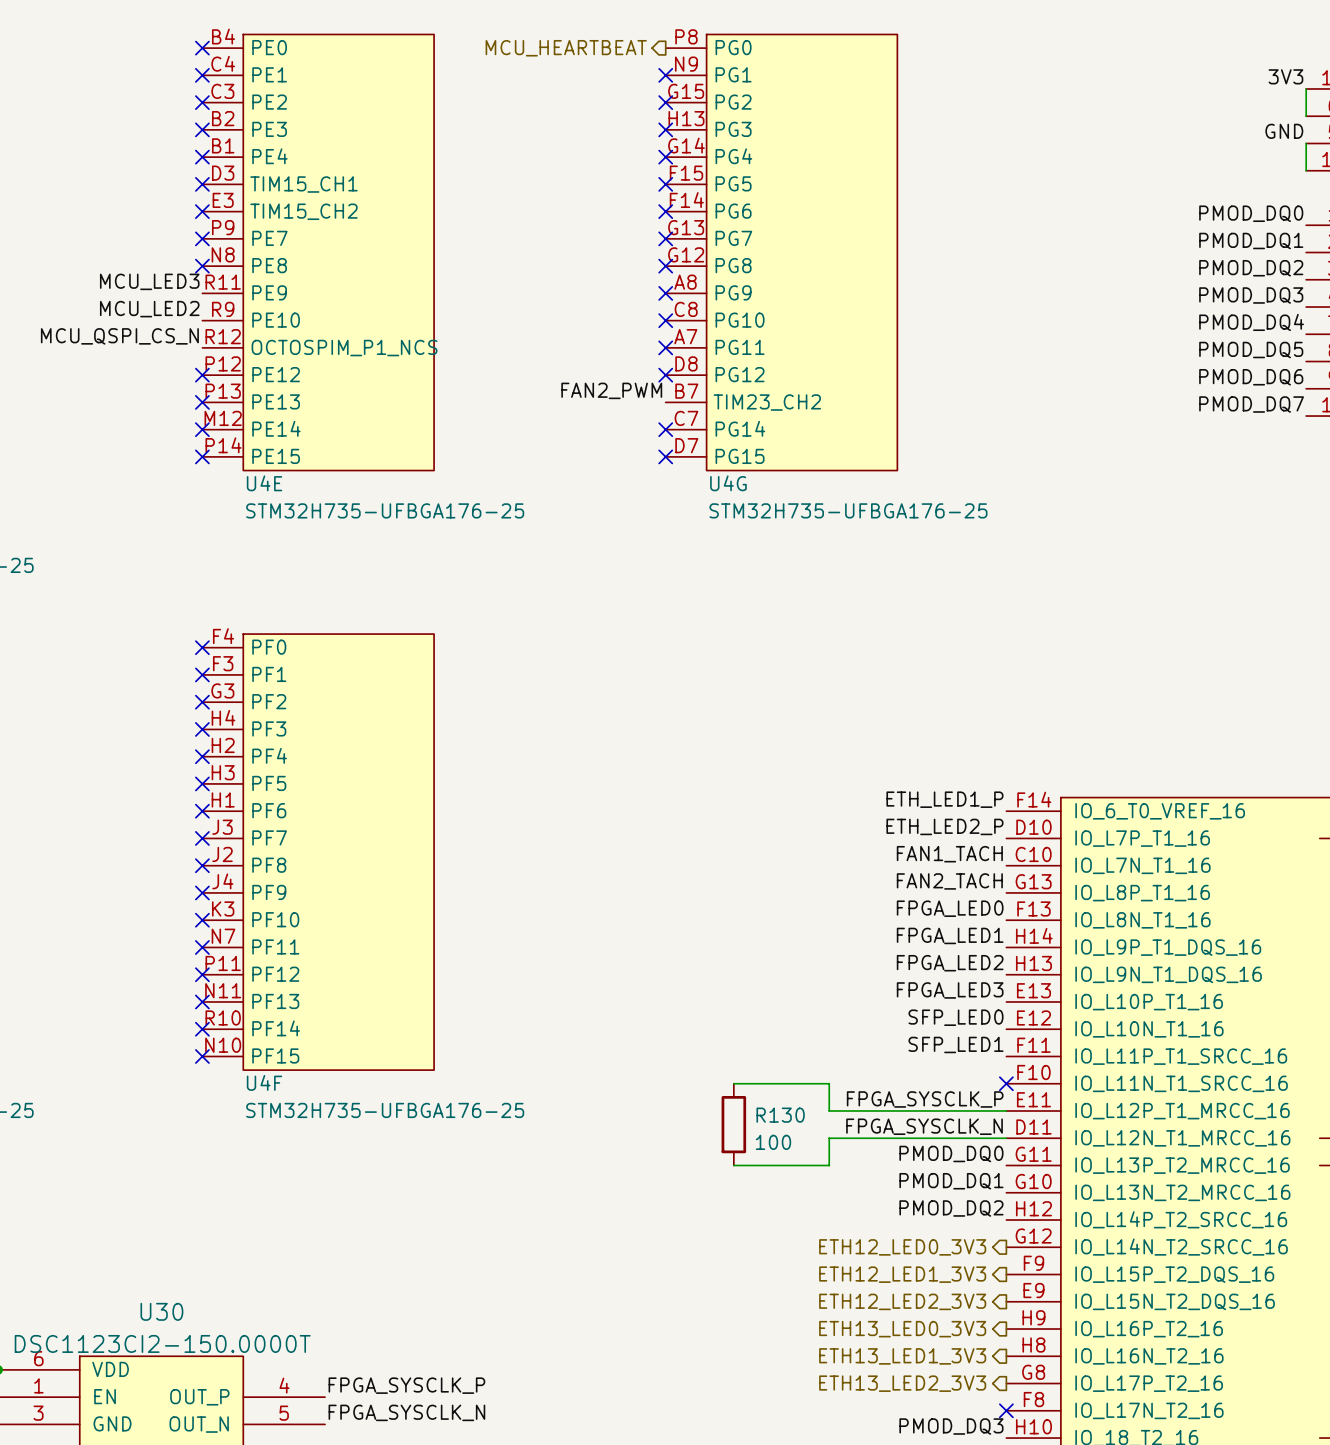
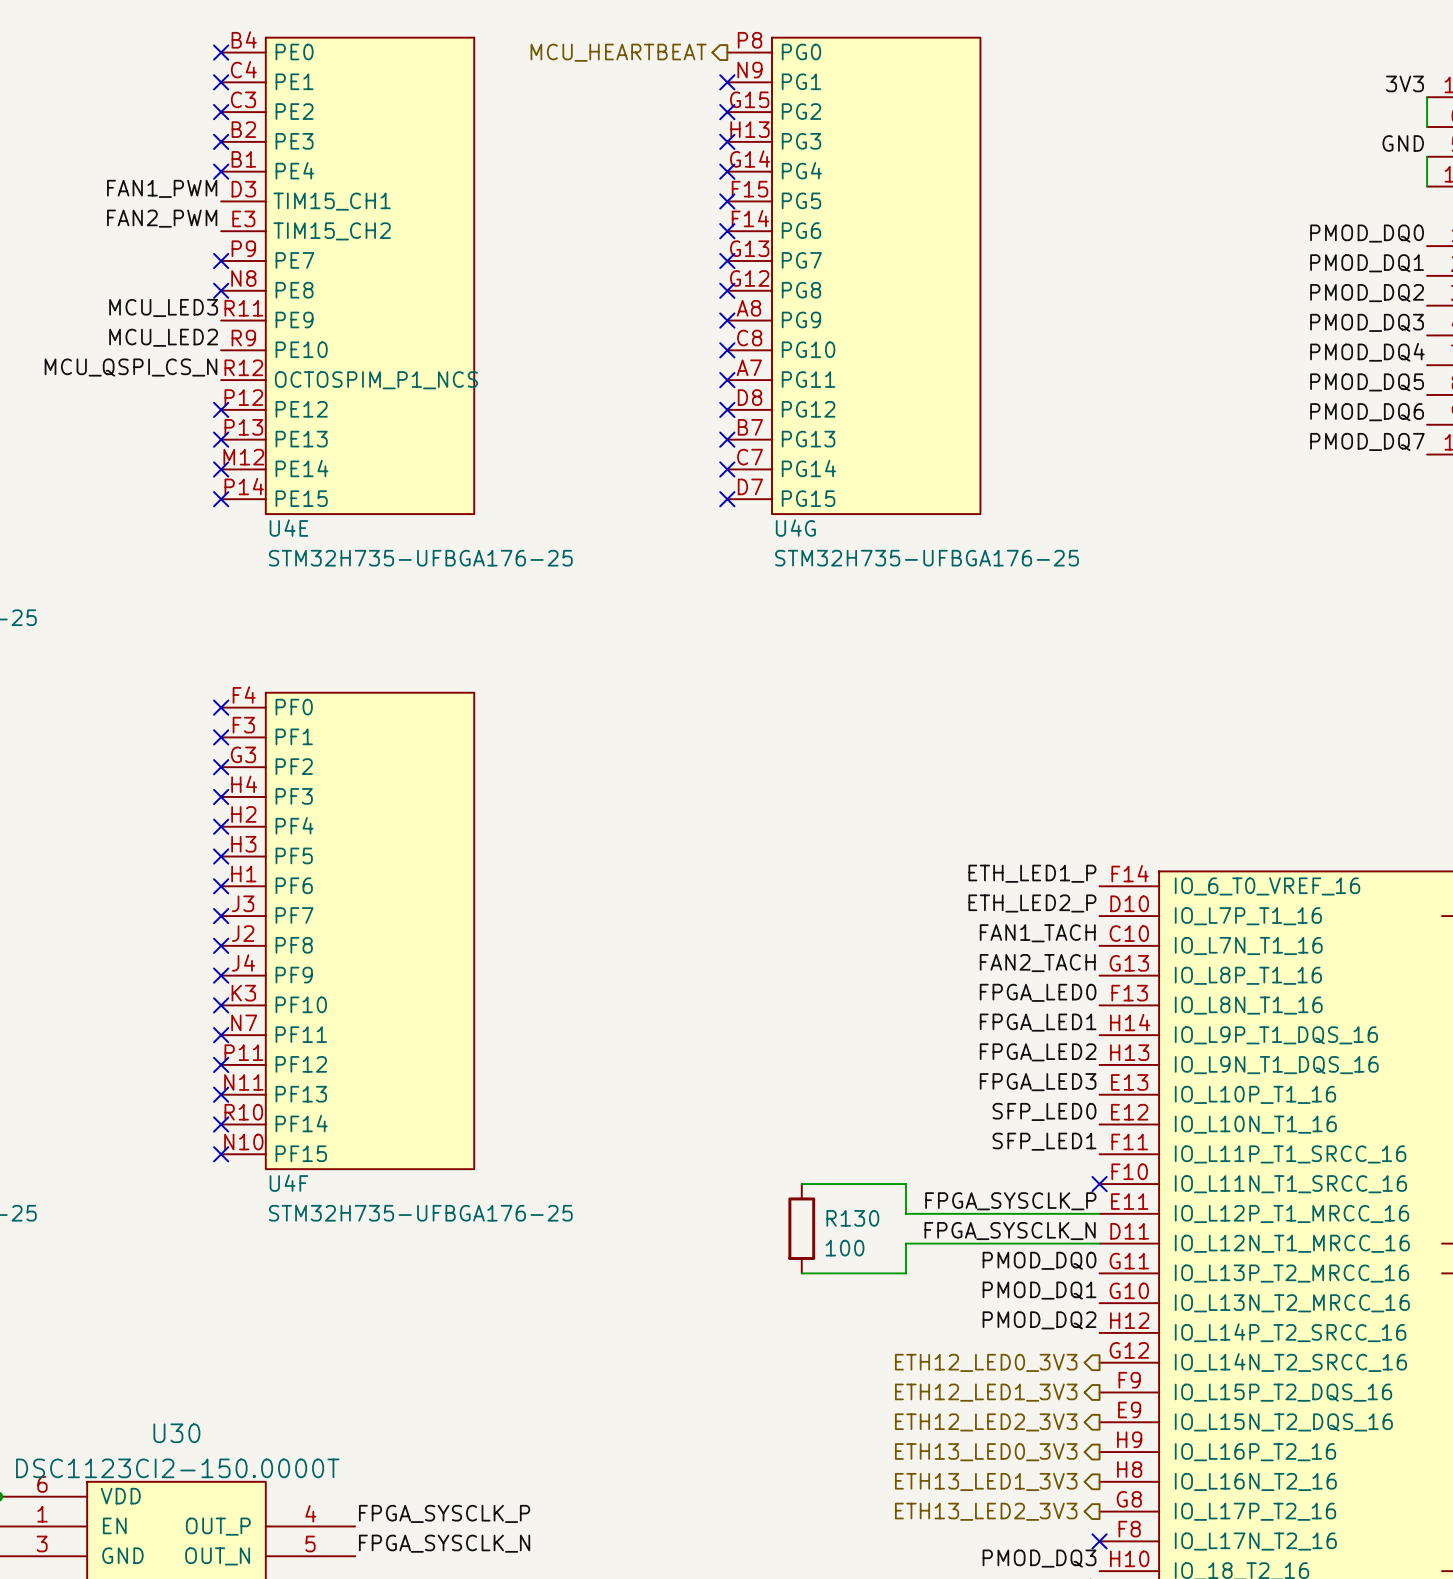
label: none -> FAN1_PWM (162, 188)
no-connect mark: (202, 184) -> none
label: none -> FAN2_PWM (162, 218)
no-connect mark: (202, 211) -> none
label: FAN2_PWM (611, 390) -> none
no-connect mark: none -> (727, 439)
U4G pin name: TIM23_CH2 (767, 402) -> PG13 (808, 439)

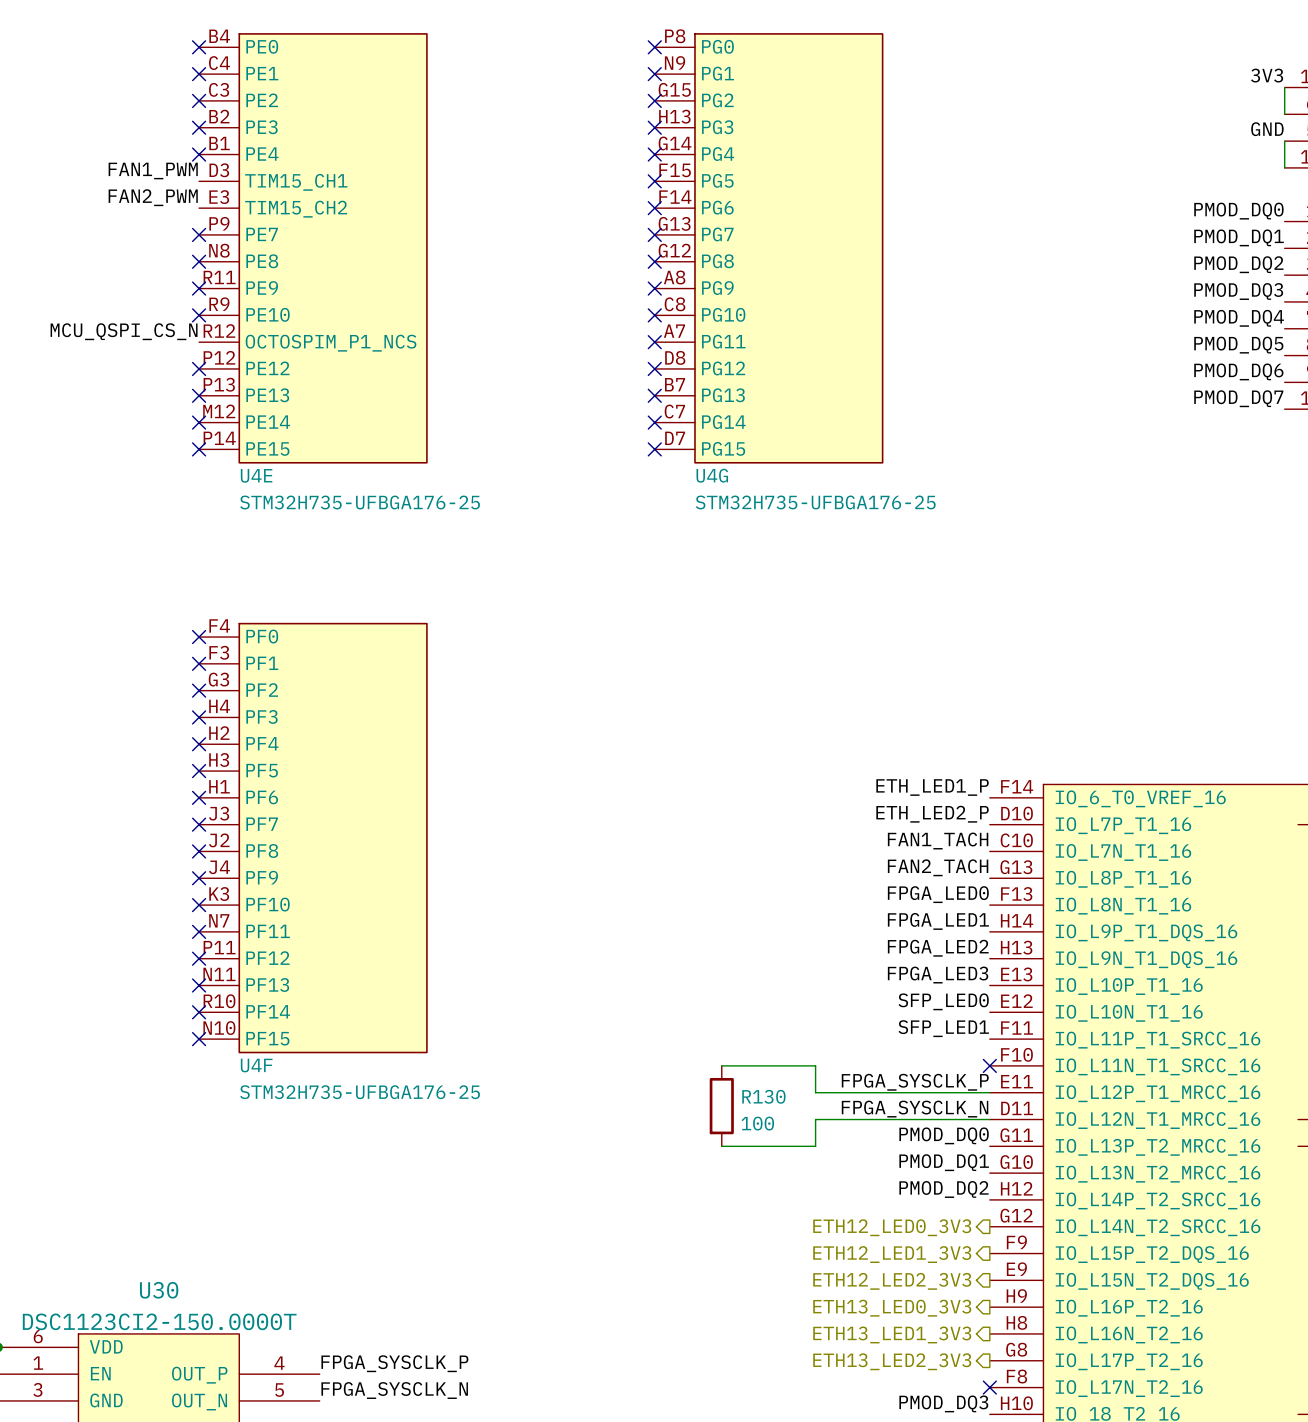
hierarchical label: MCU_HEARTBEAT (618, 52) -> none
no-connect mark: none -> (654, 47)
label: MCU_LED3 (163, 307) -> none
no-connect mark: none -> (199, 288)
label: MCU_LED2 (163, 337) -> none
no-connect mark: none -> (199, 315)

